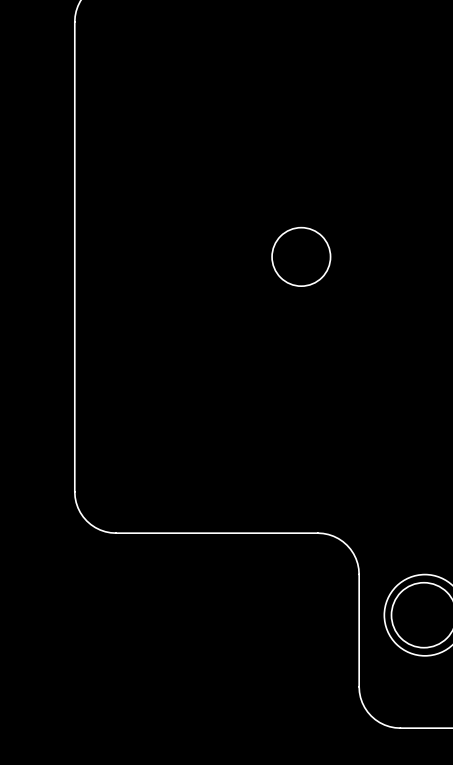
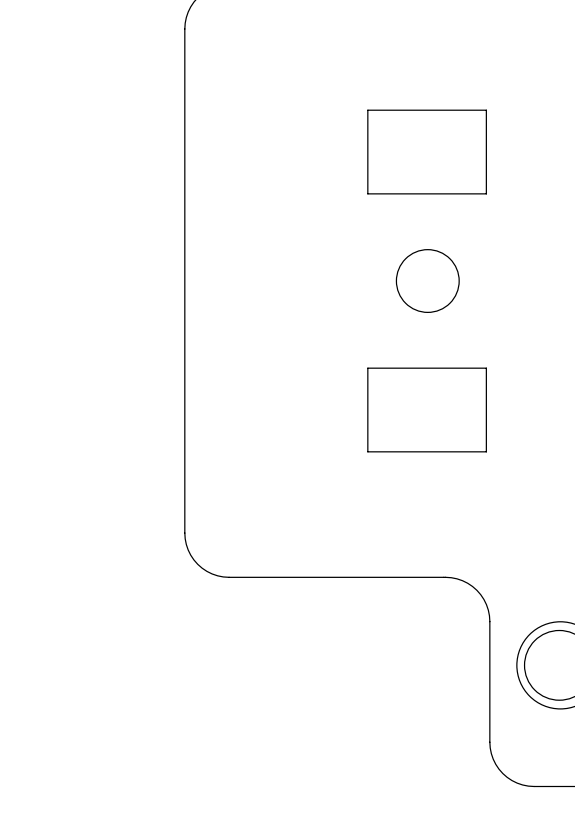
board edge: none -> (367, 110) (486, 110) (486, 193) (367, 193) (367, 110)
board edge: none -> (367, 368) (367, 451) (486, 451) (486, 368) (367, 368)

